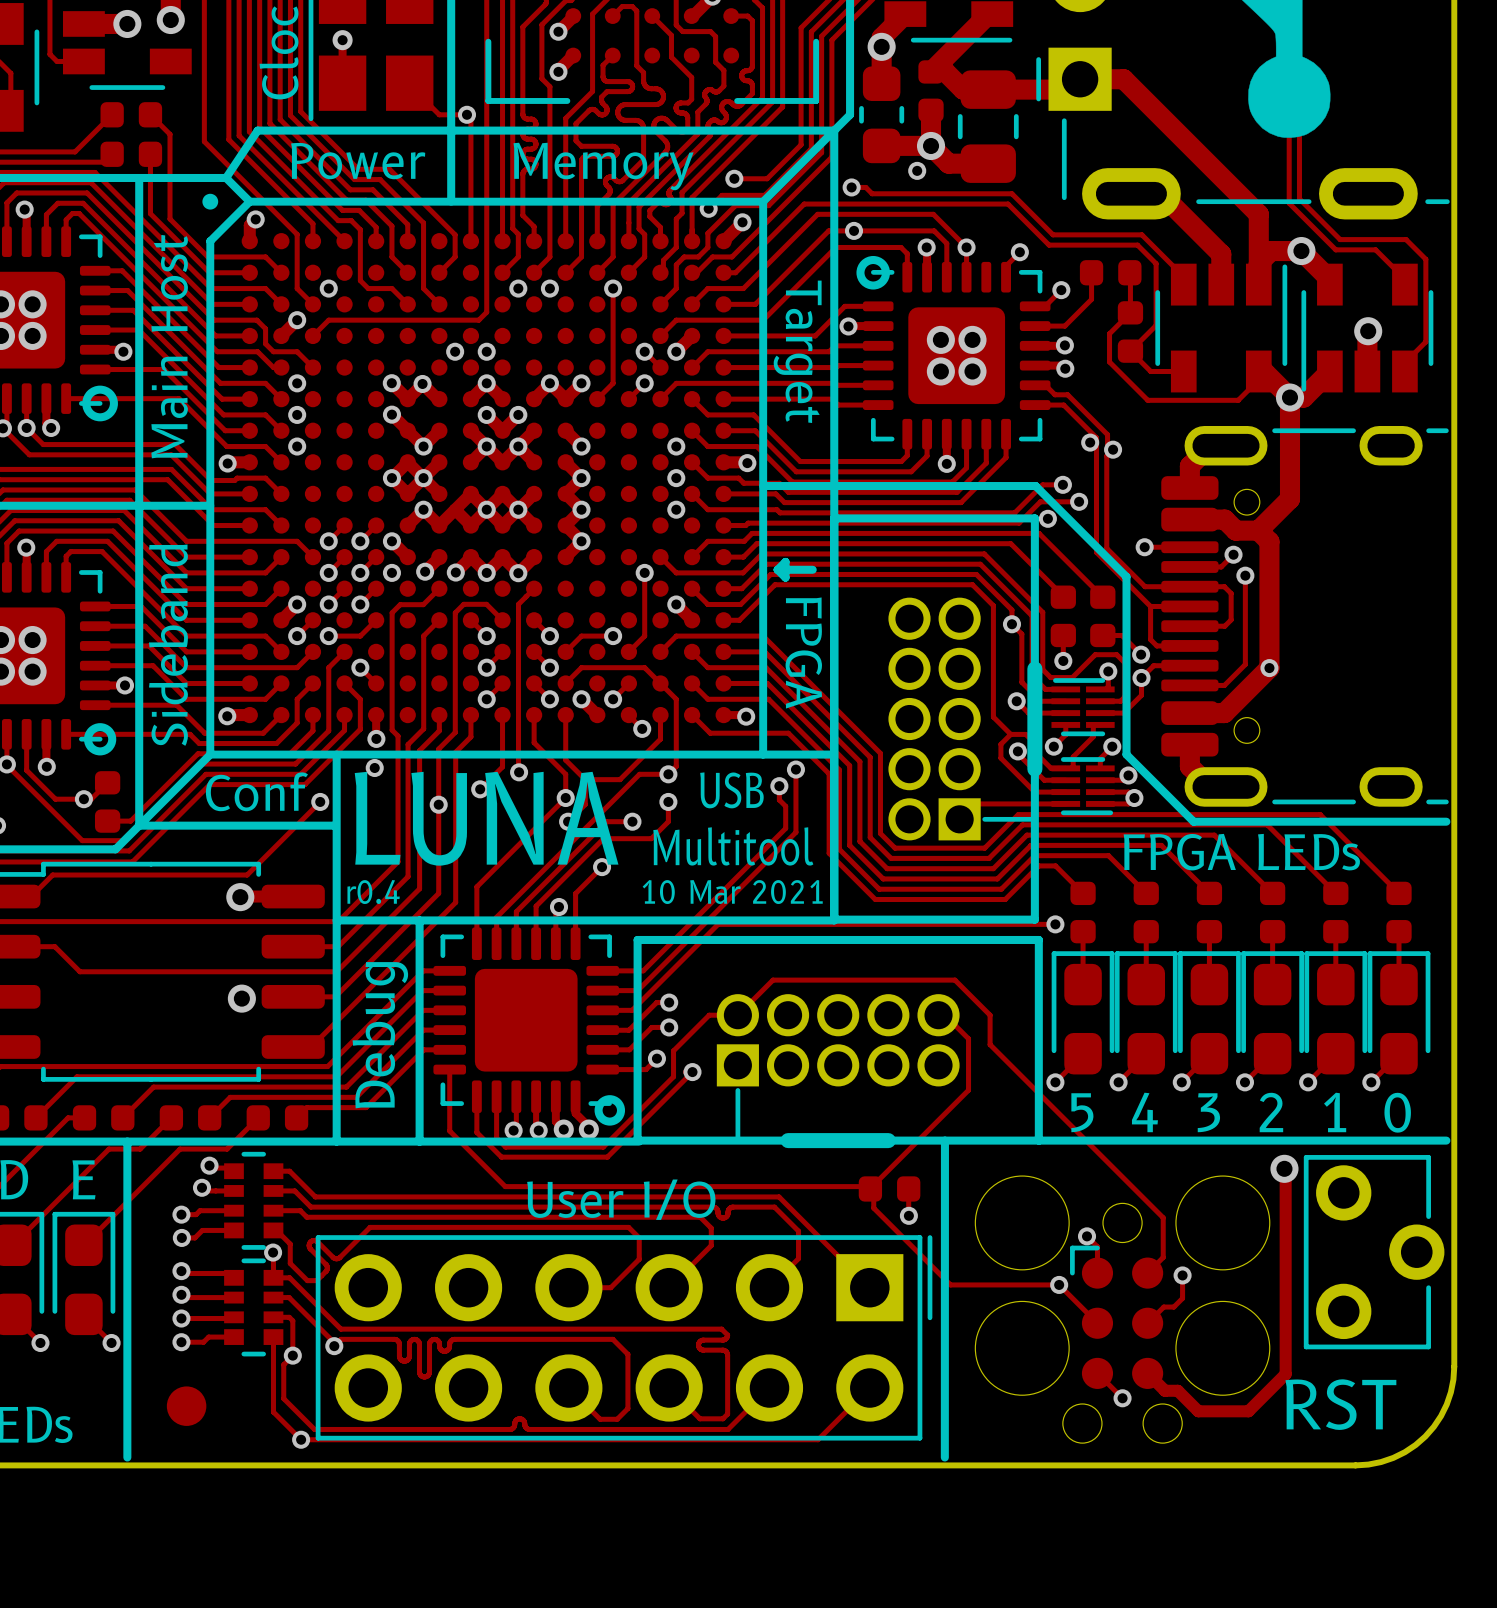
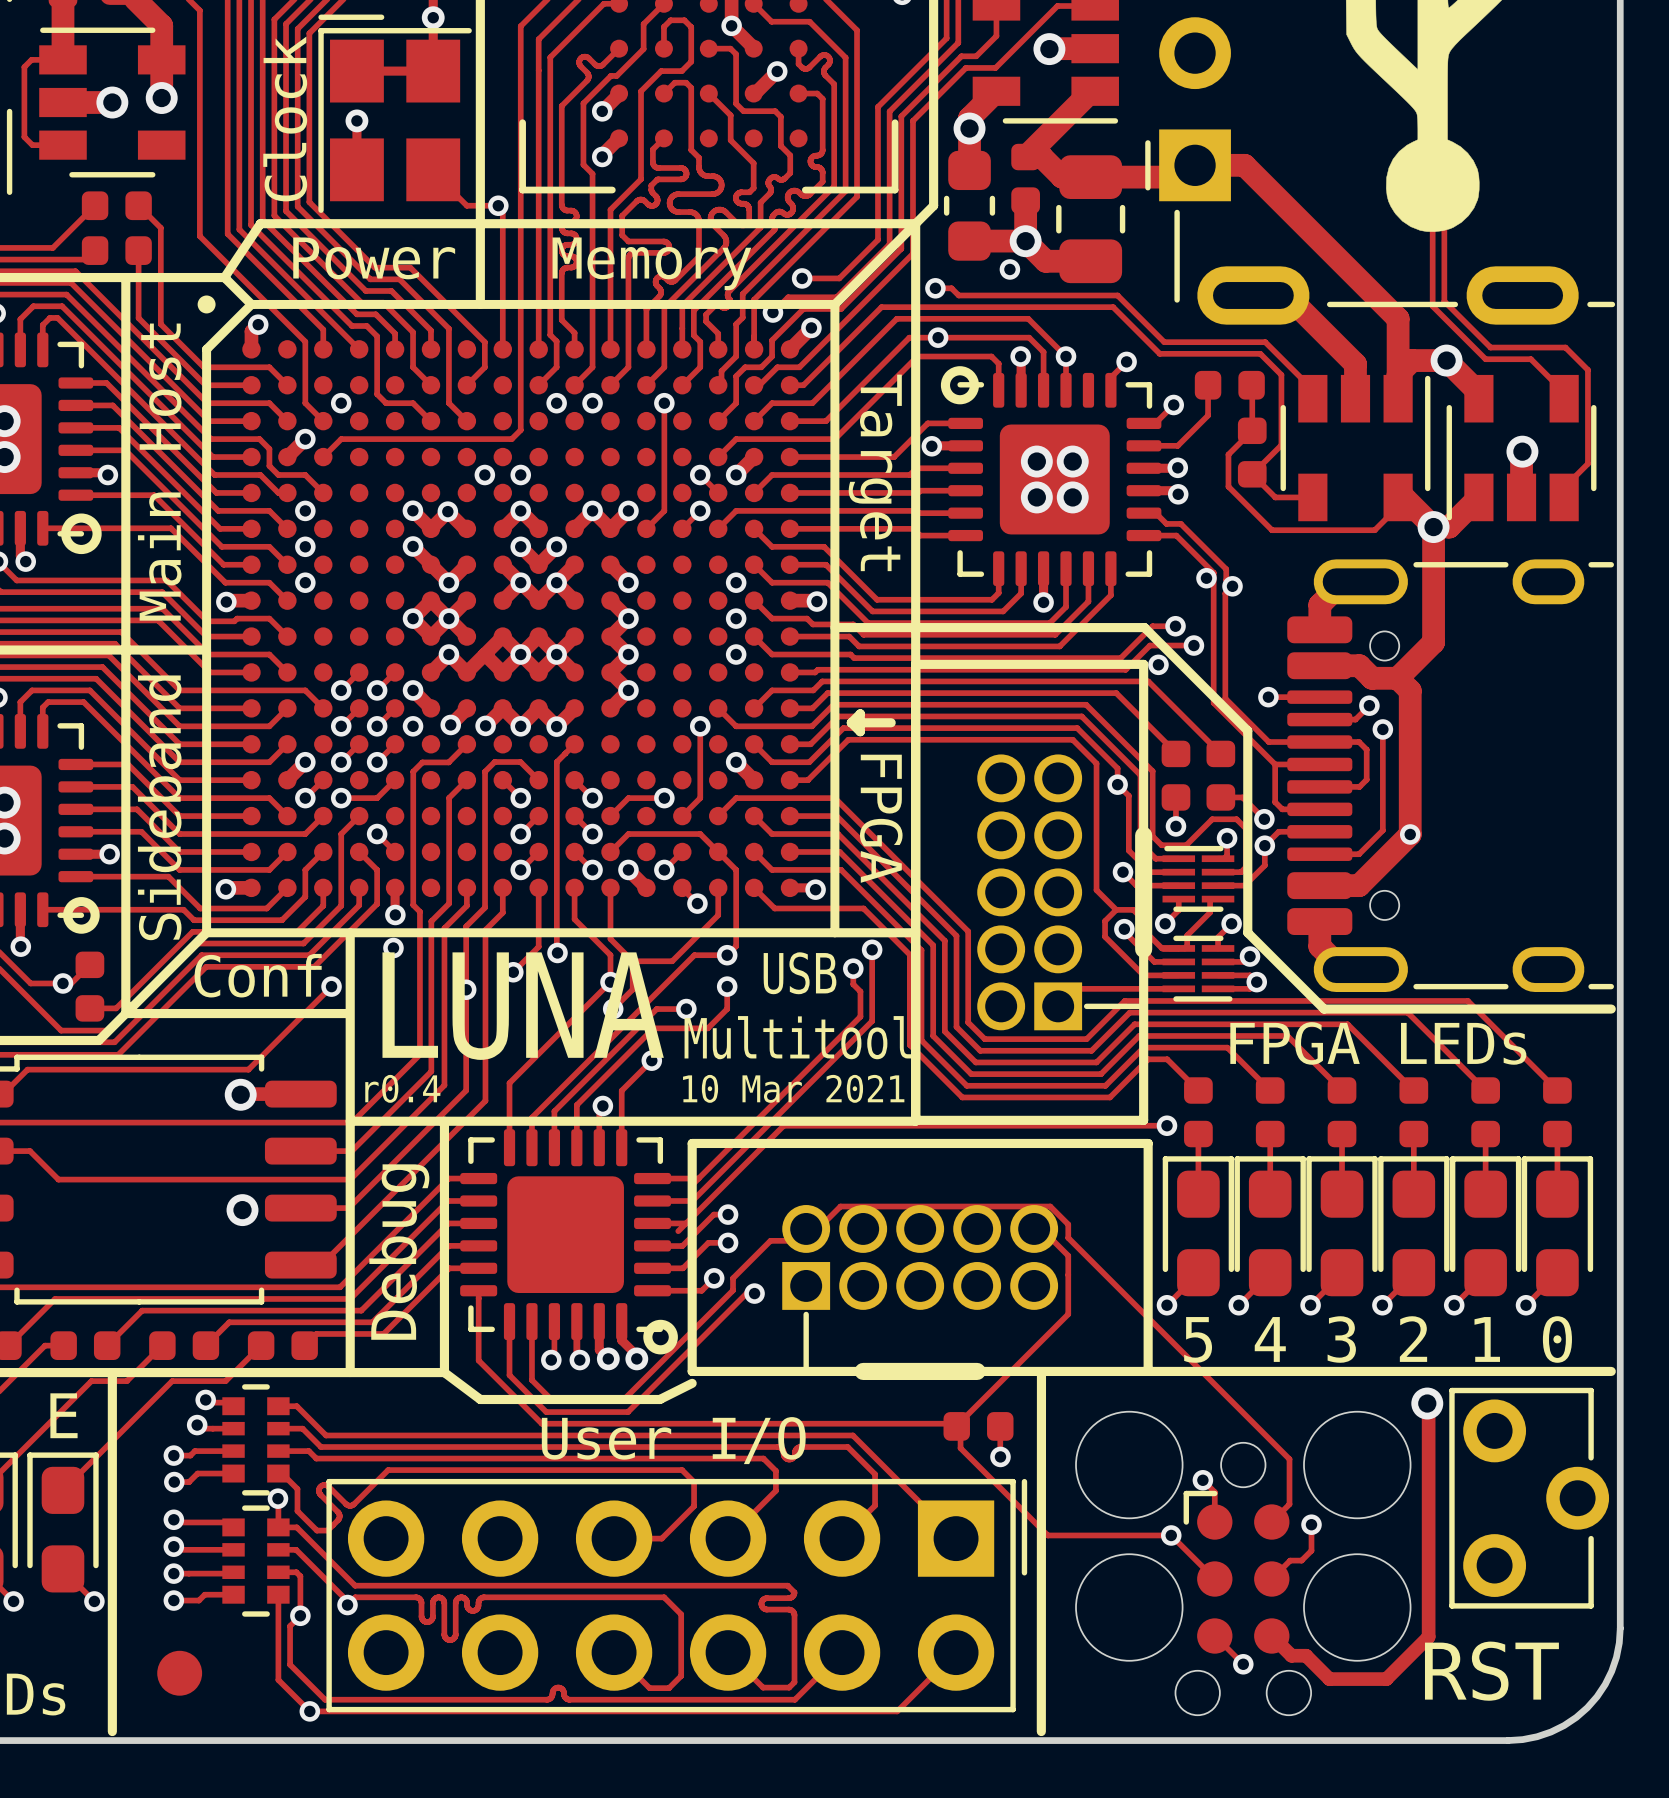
track: (990, 1044) (990, 1015) (954, 980) (773, 980) (737, 1015) (709, 1015) (673, 1050) (673, 1058) -> (1092, 1262) (1068, 1237) (1068, 1224) (1050, 1206) (840, 1206) (806, 1240) (770, 1240) (733, 1278)
track: (673, 1069) (673, 1076) (603, 1147) (505, 1147) (496, 1138) -> (733, 1290) (623, 1400) (552, 1400) (531, 1380) (531, 1368)
track: (692, 1072) (607, 1157) (501, 1157) (476, 1132) -> (746, 1293) (628, 1412) (546, 1412) (509, 1375) (509, 1362)
line: (419, 1141) (639, 1141) -> (444, 1372) (480, 1399) (659, 1399) (692, 1383)

